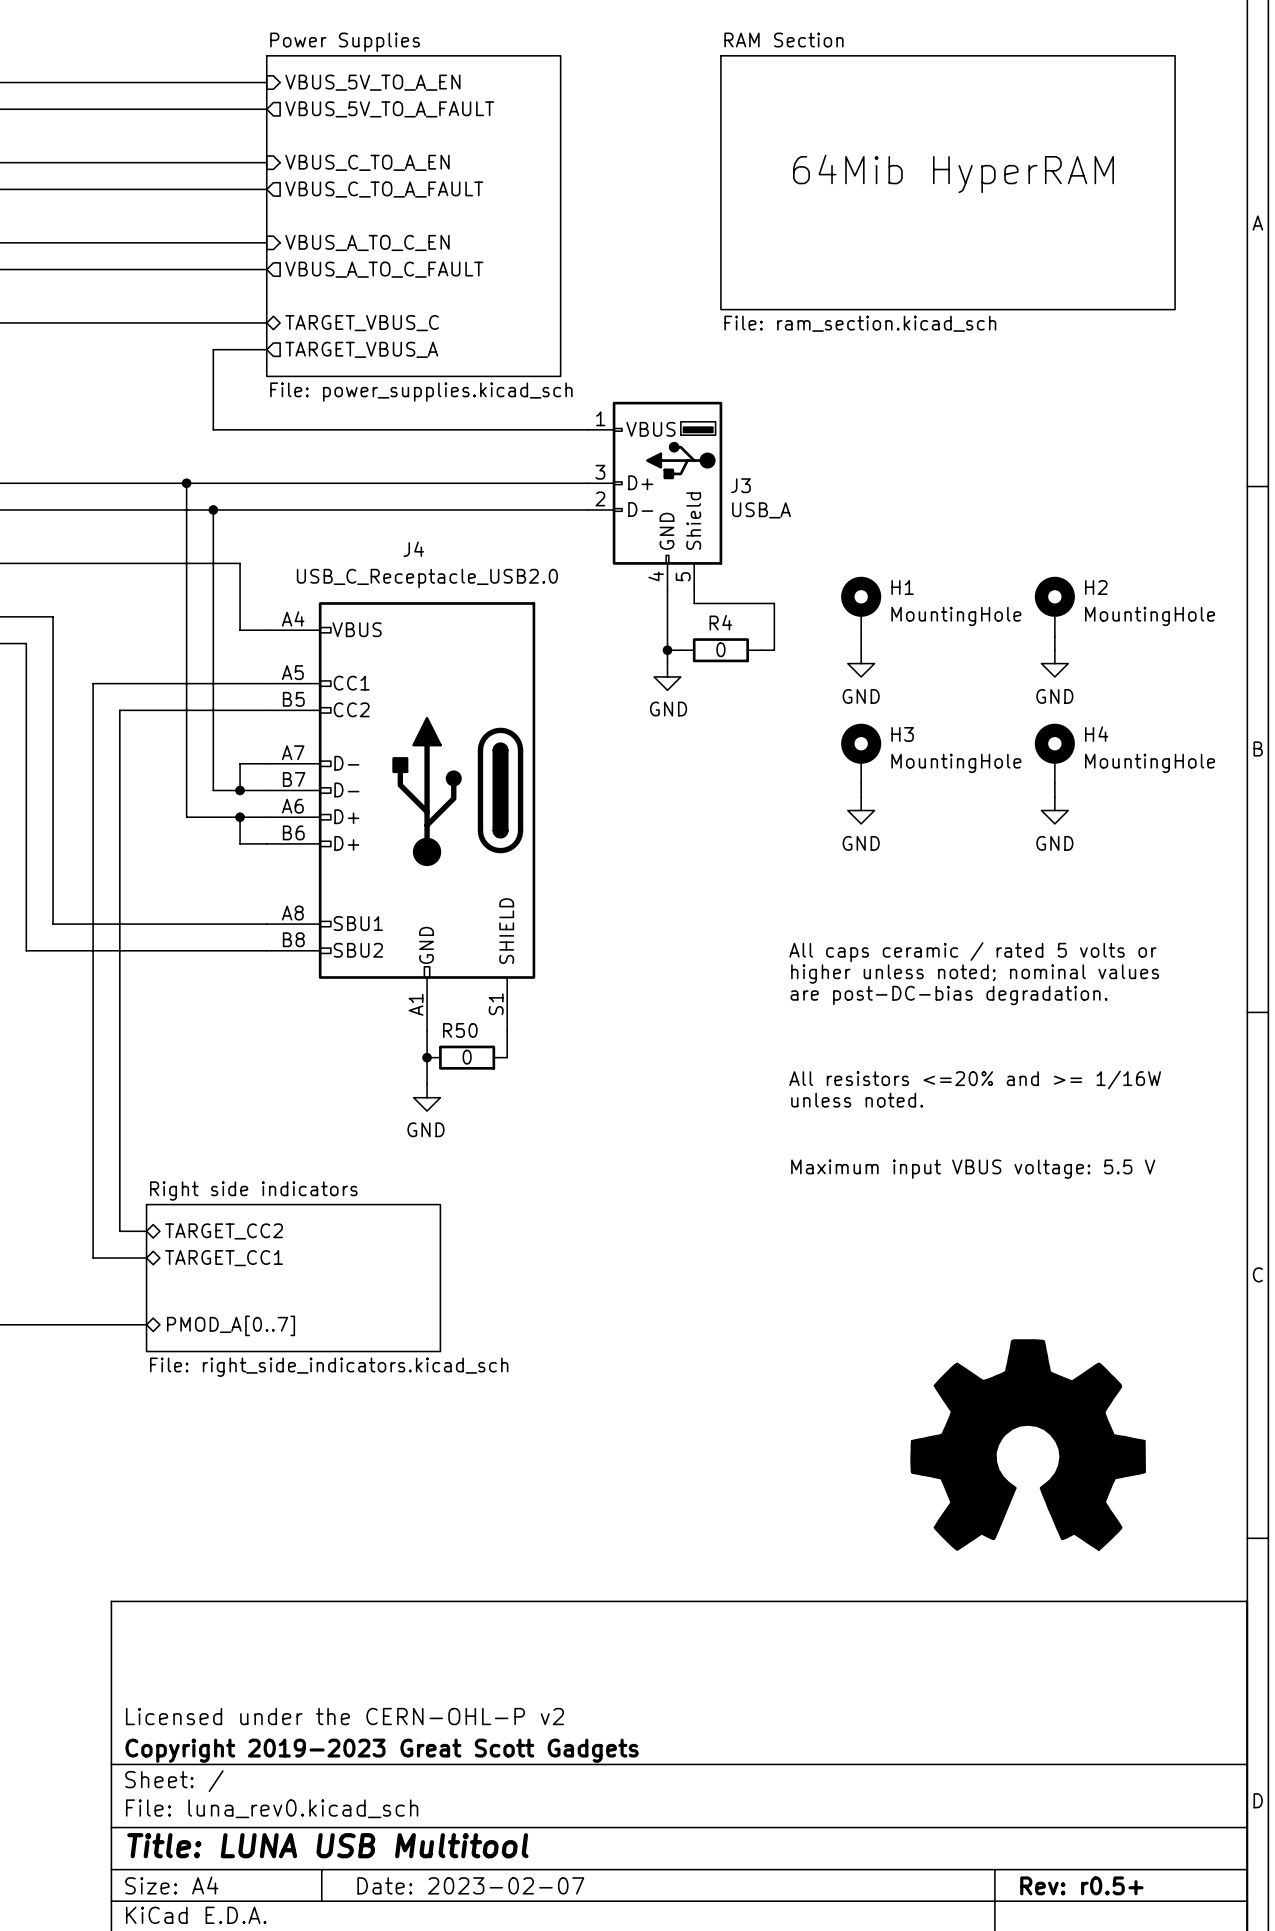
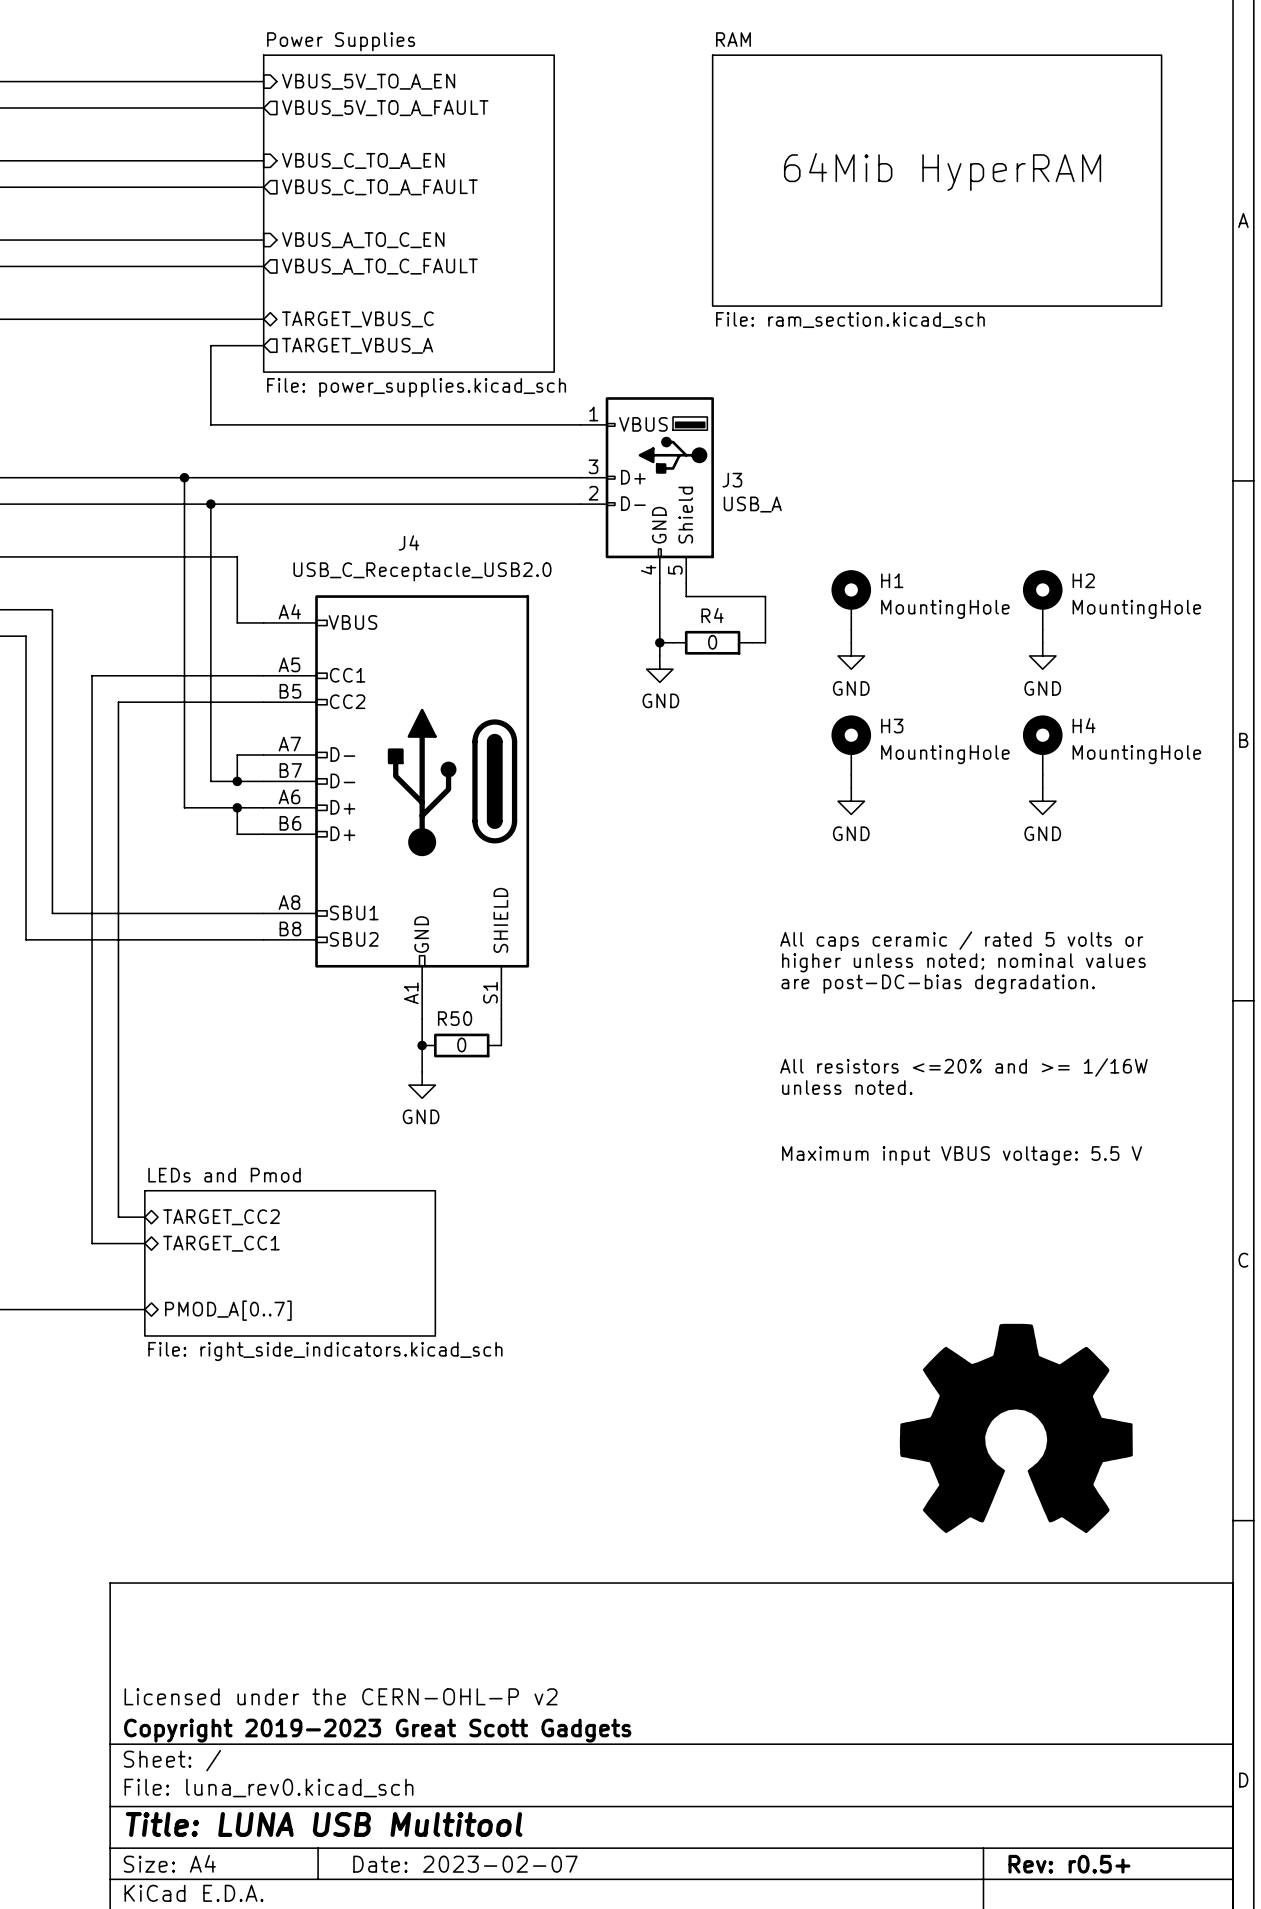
sheet RAM Section name: RAM Section (783, 40) -> RAM (733, 39)
sheet Right side indicators name: Right side indicators (253, 1191) -> LEDs and Pmod (224, 1175)

